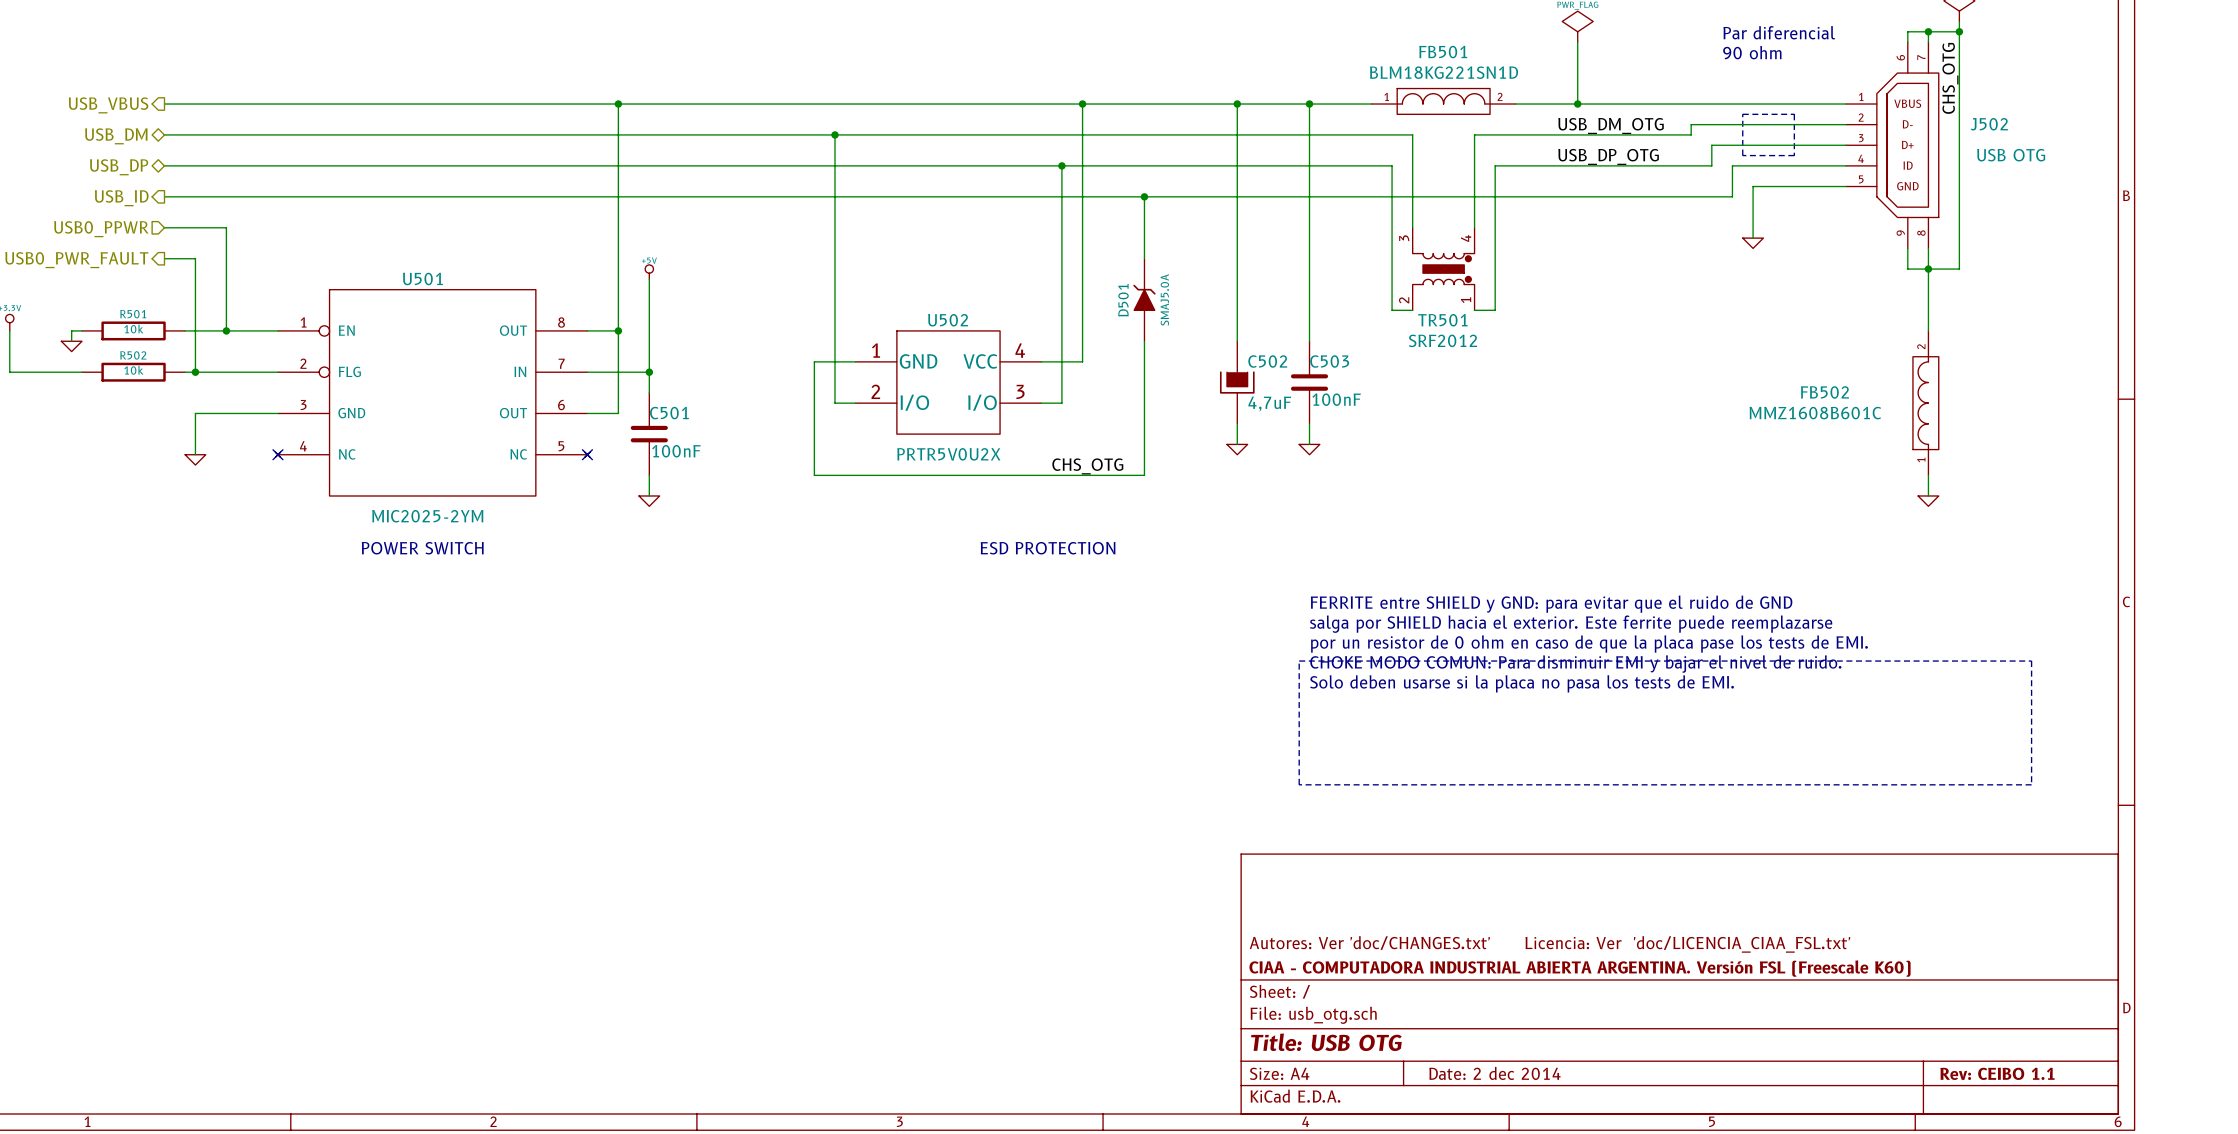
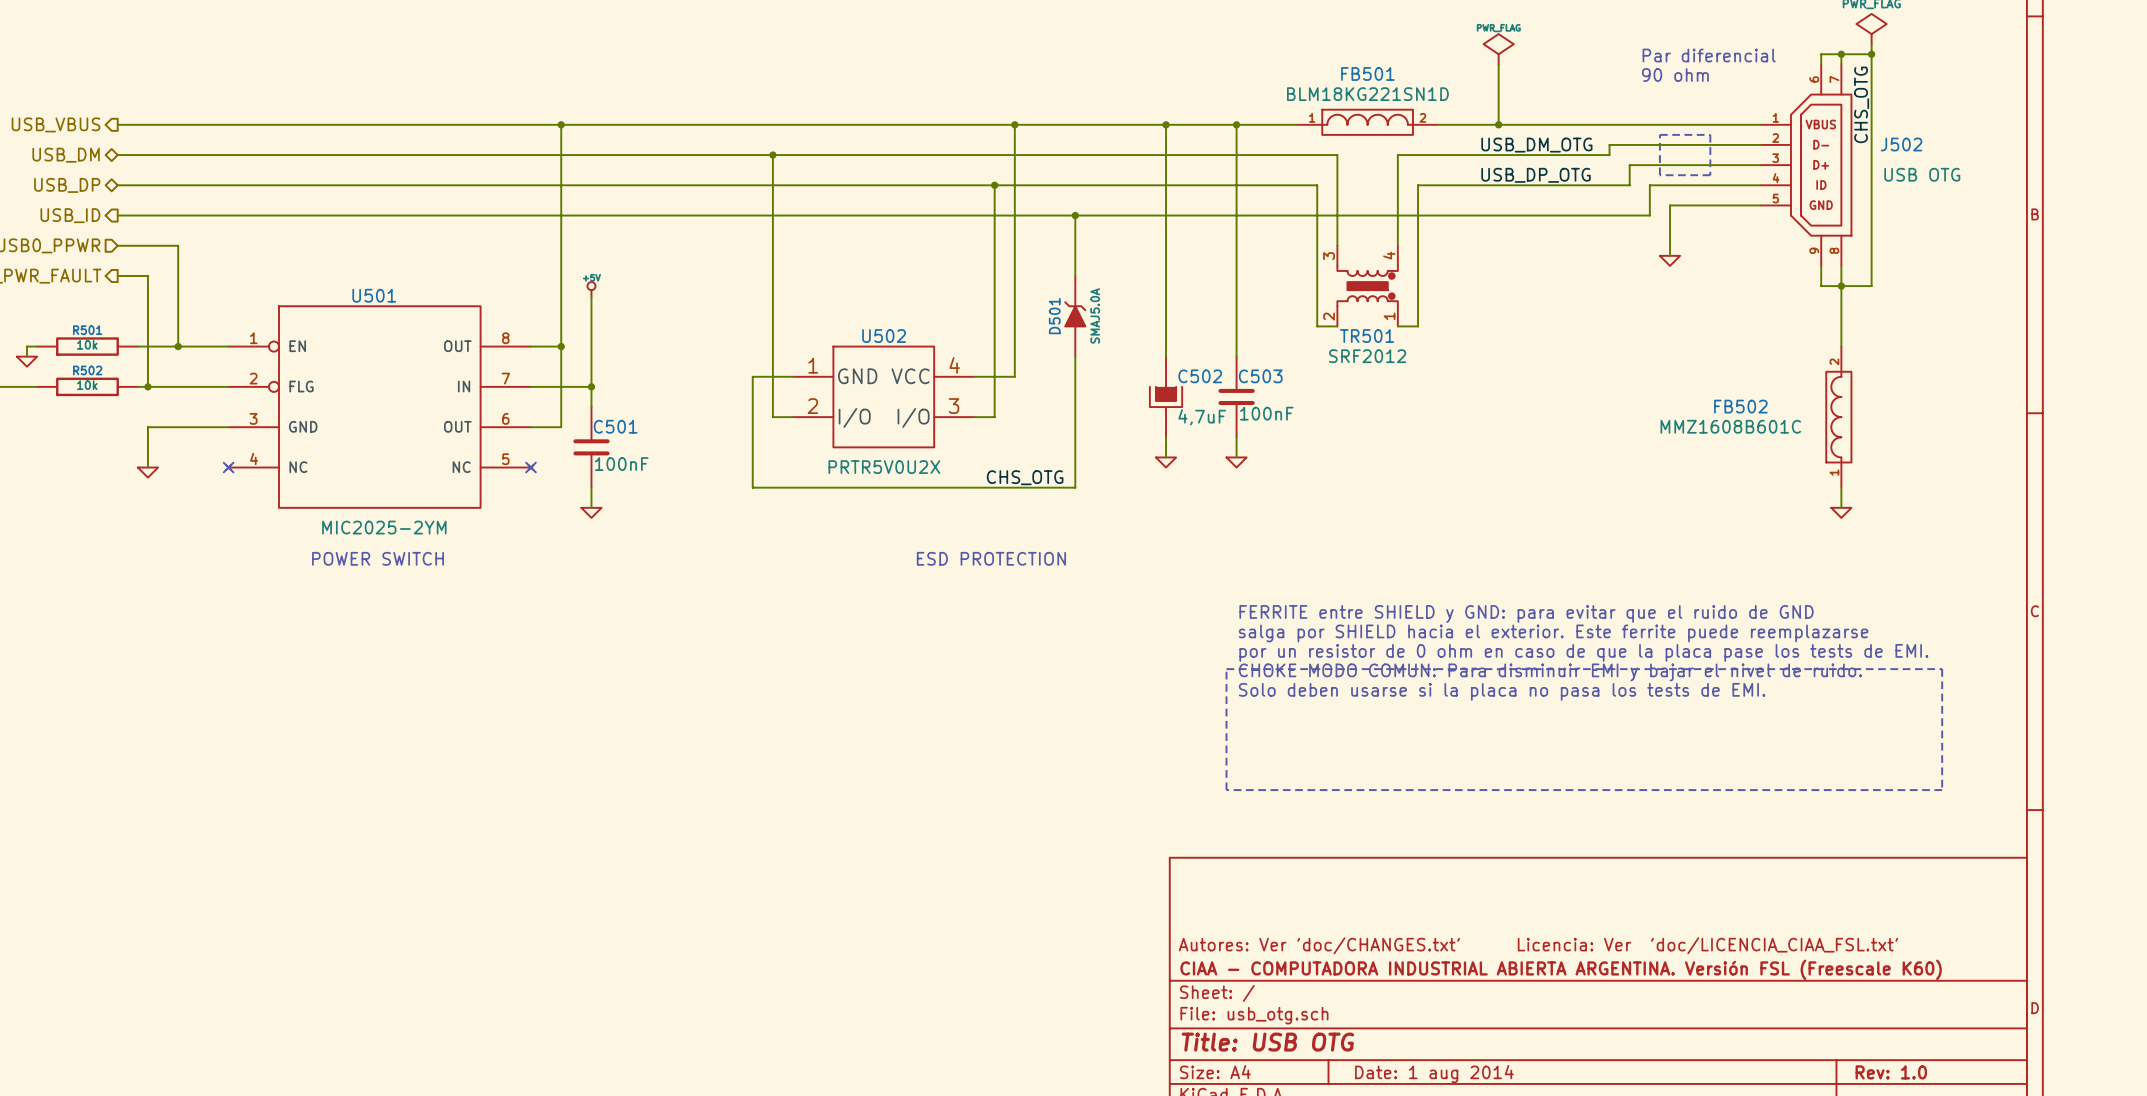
title block: Date: 2 dec 2014 (1494, 1073) -> Date: 1 aug 2014 (1434, 1074)
title block: Rev: CEIBO 1.1 (1997, 1073) -> Rev: 1.0 (1891, 1072)

